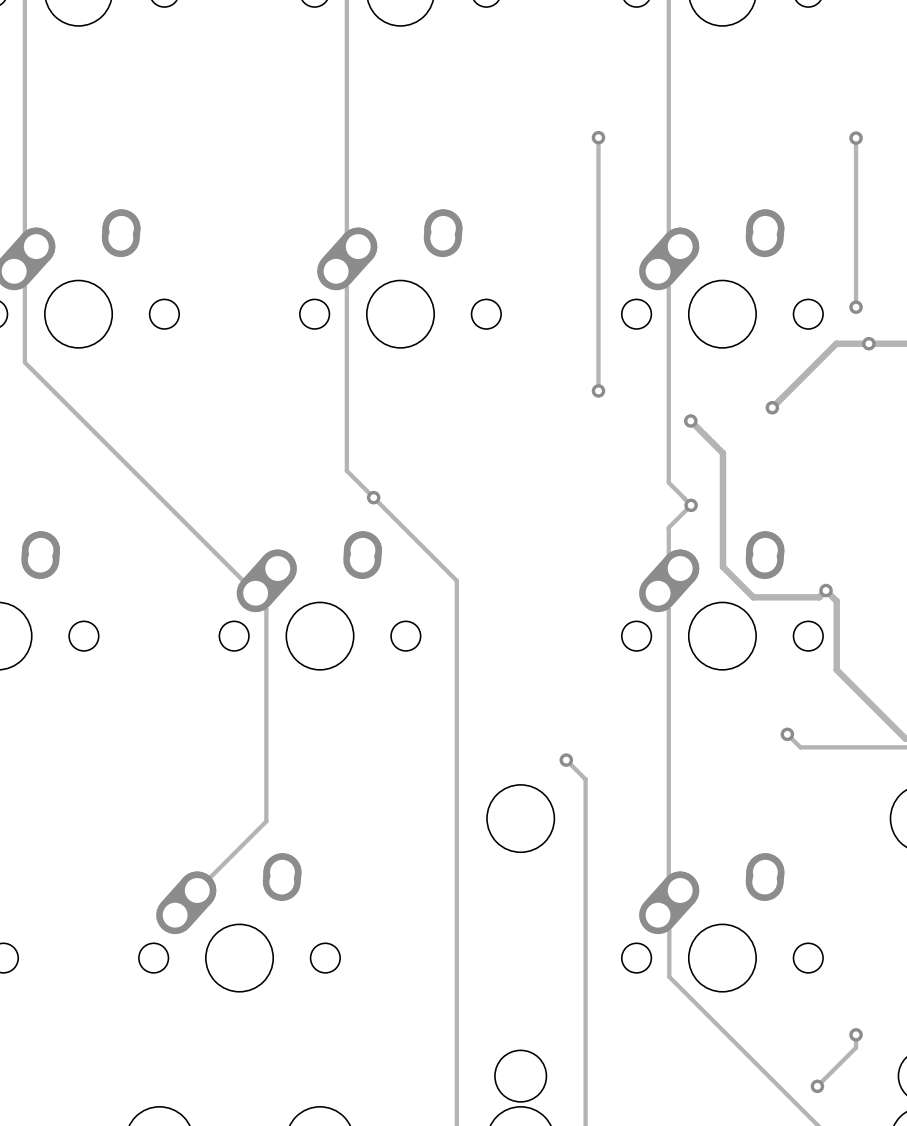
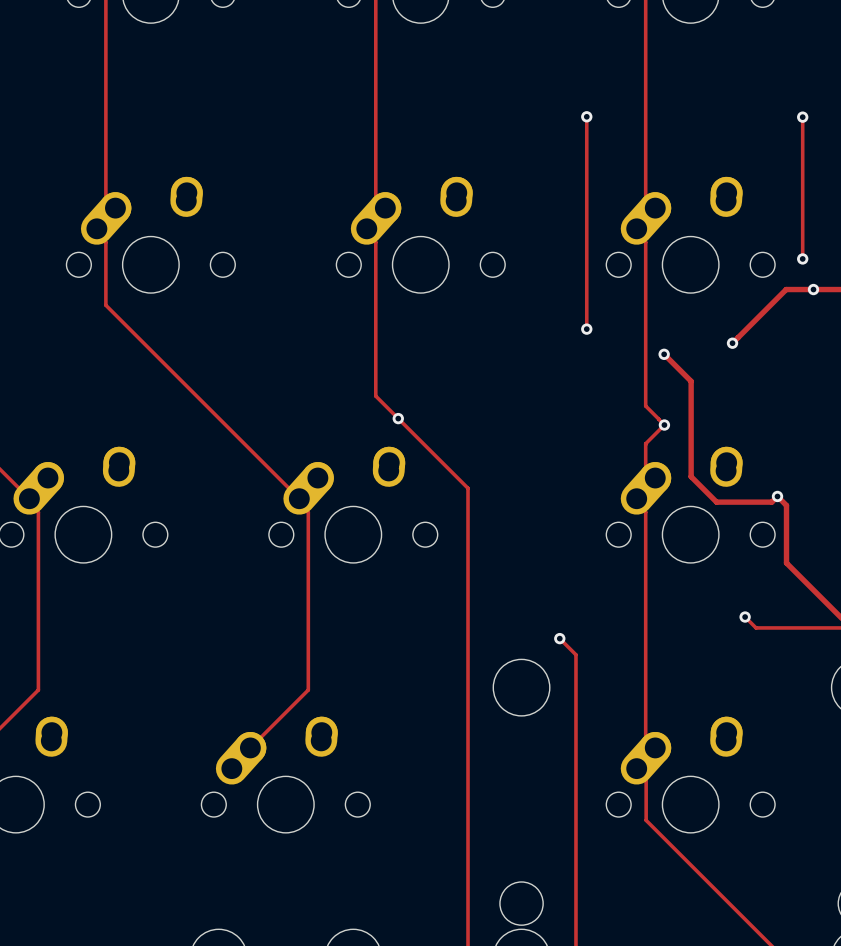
track: (856, 1034) (856, 1047) (817, 1086) -> none
via: (856, 1034) -> none
via: (817, 1086) -> none

